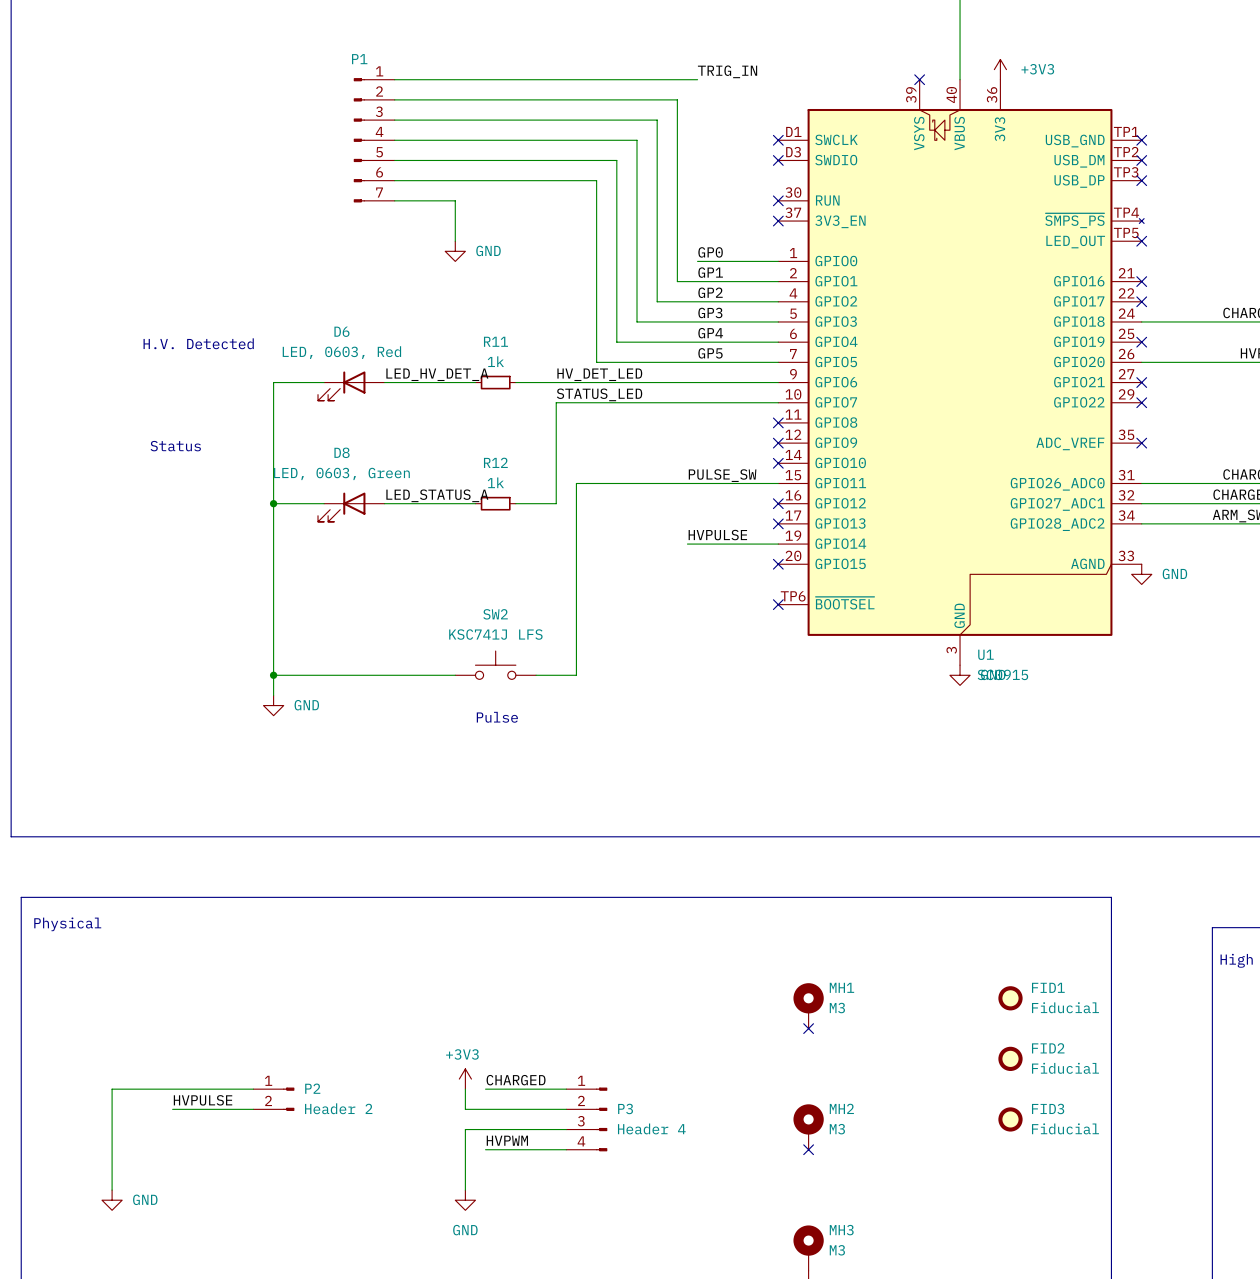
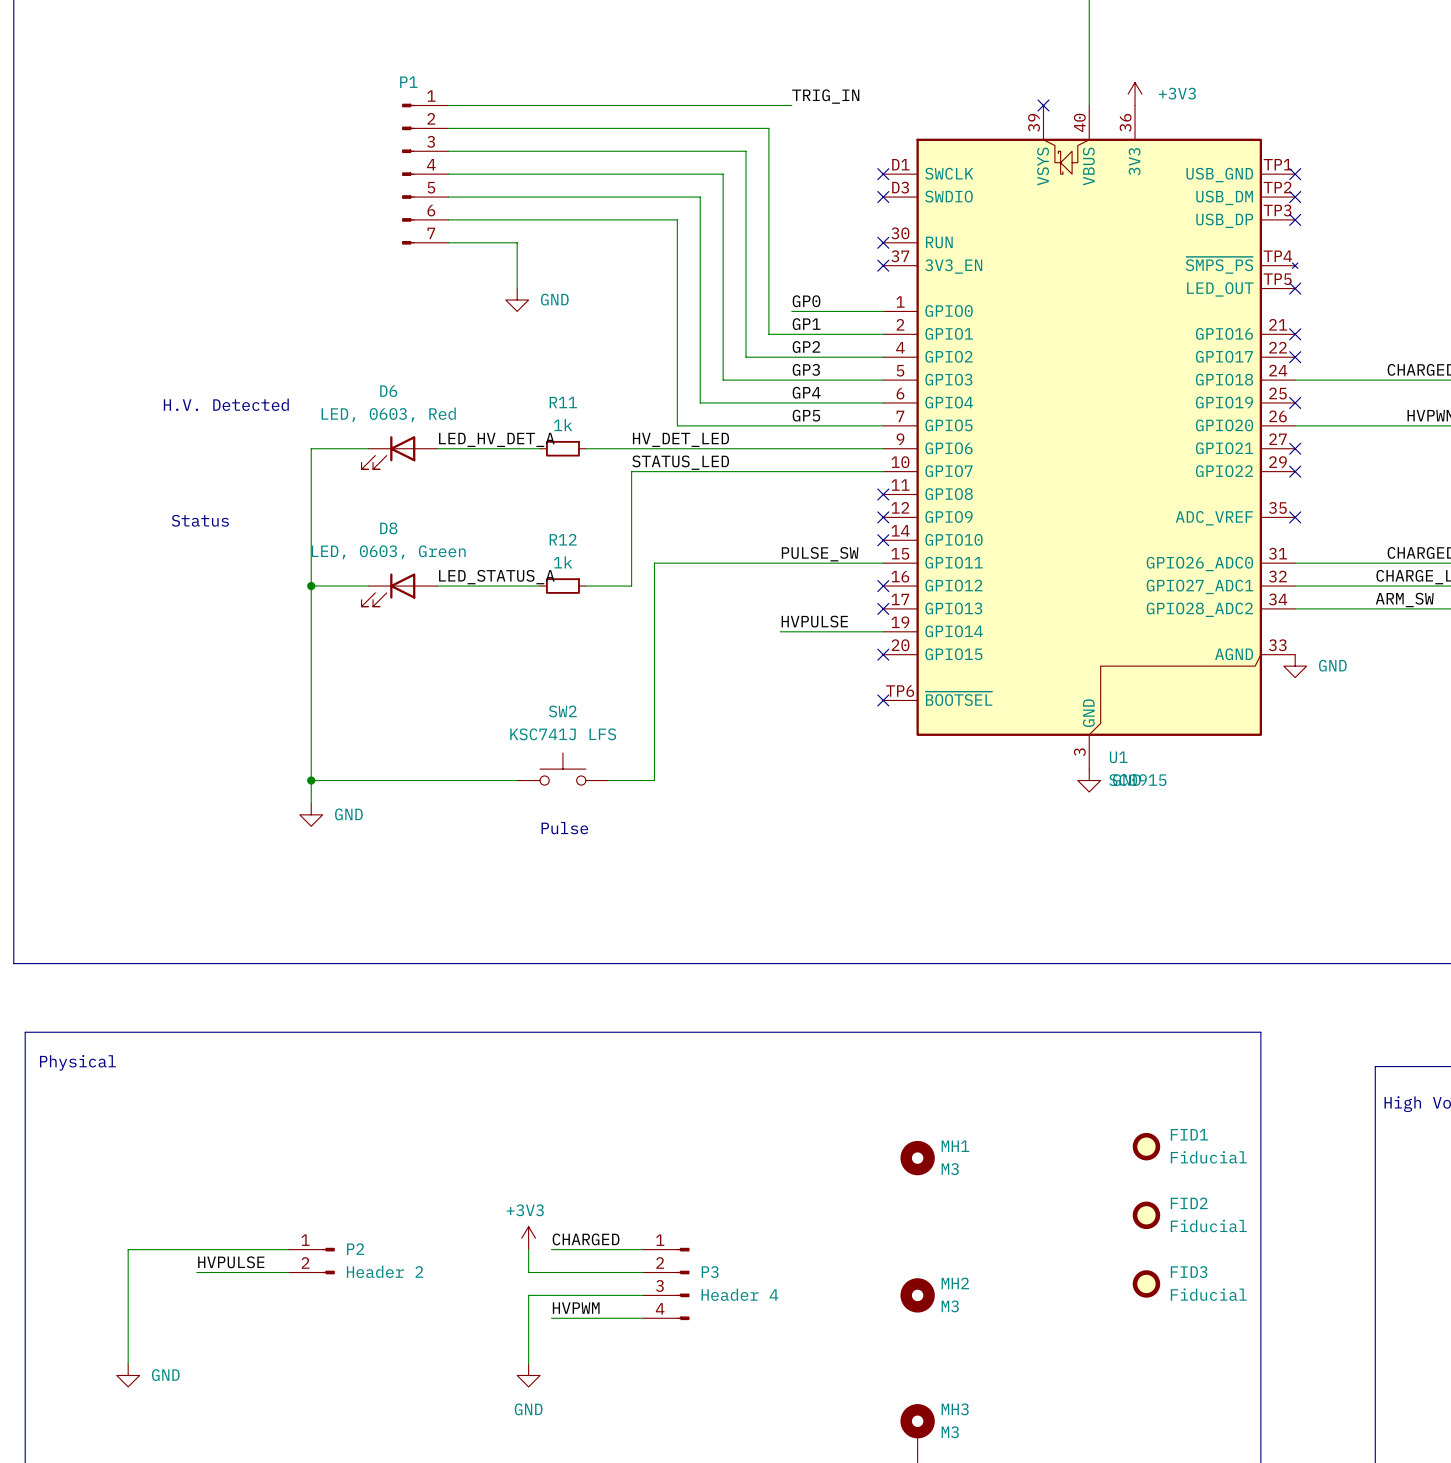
MH1 symbol: [793, 983, 824, 1029] -> [900, 1140, 935, 1176]
no-connect mark: (808, 1028) -> none
MH2 symbol: [793, 1104, 824, 1150] -> [900, 1278, 935, 1313]
no-connect mark: (808, 1149) -> none

